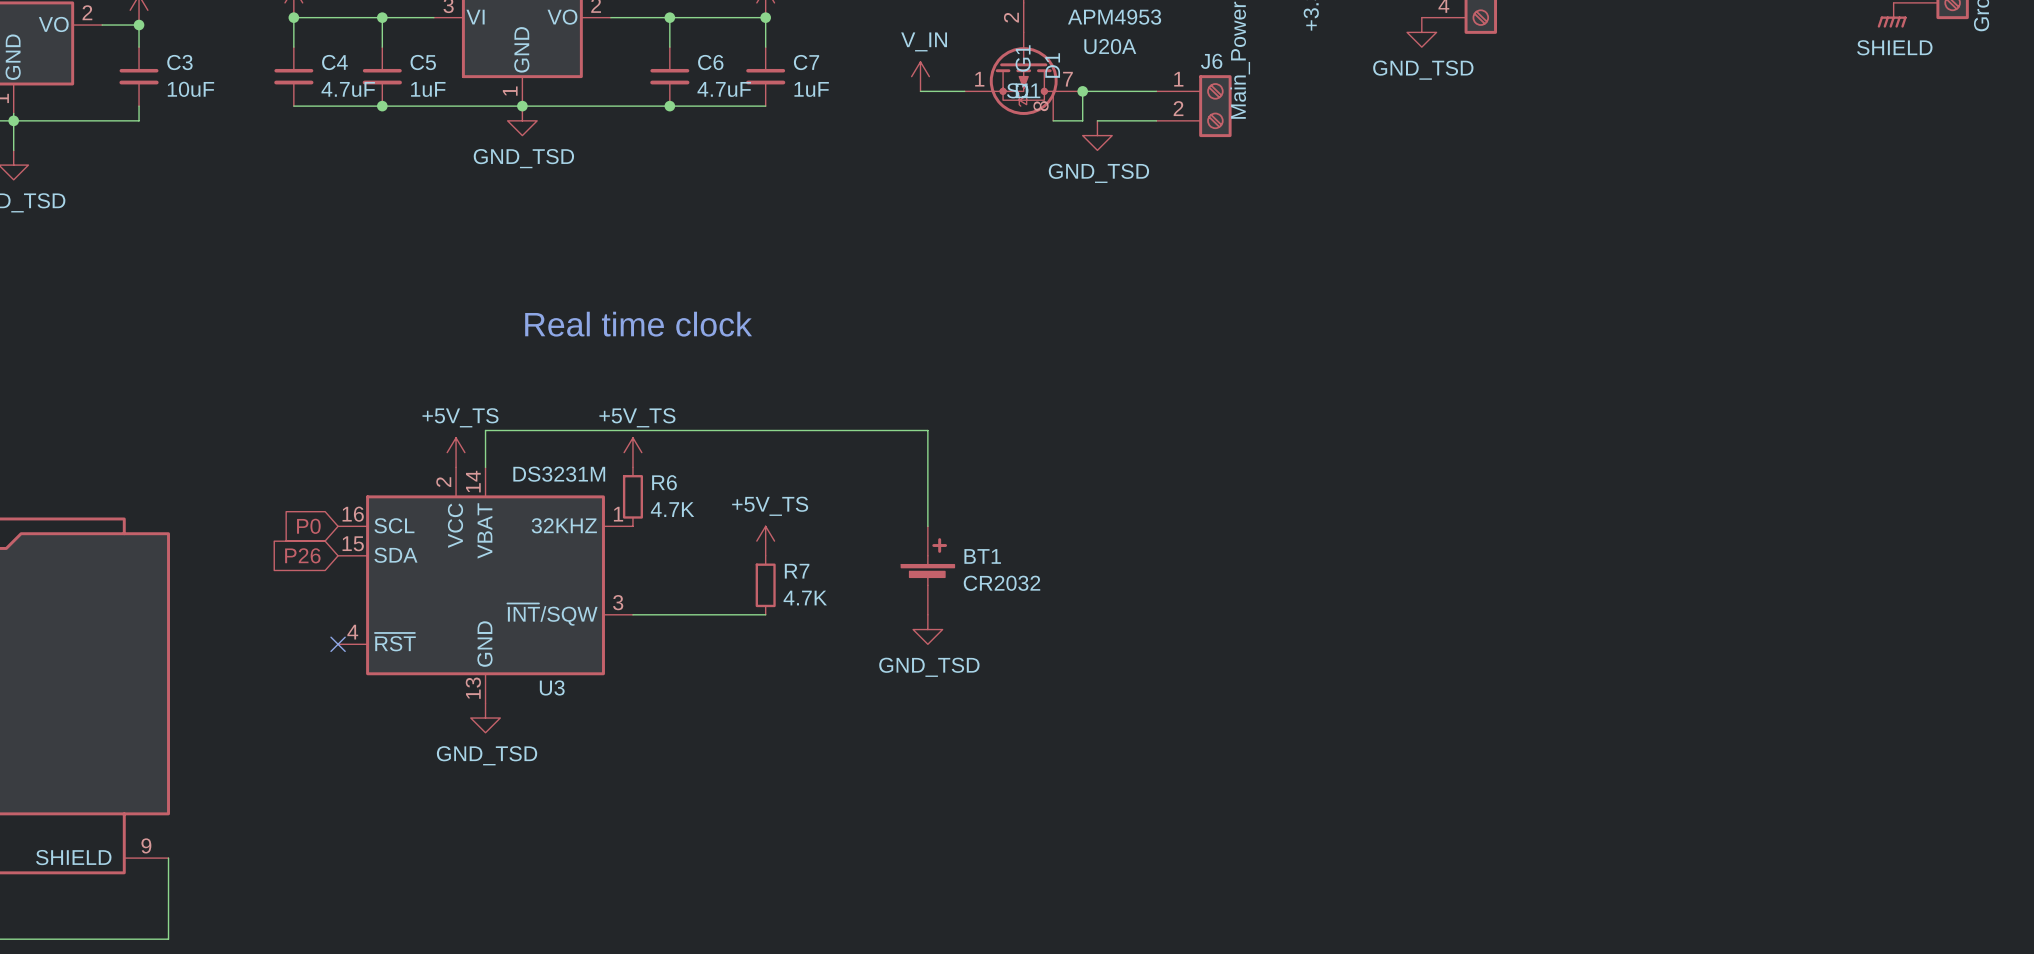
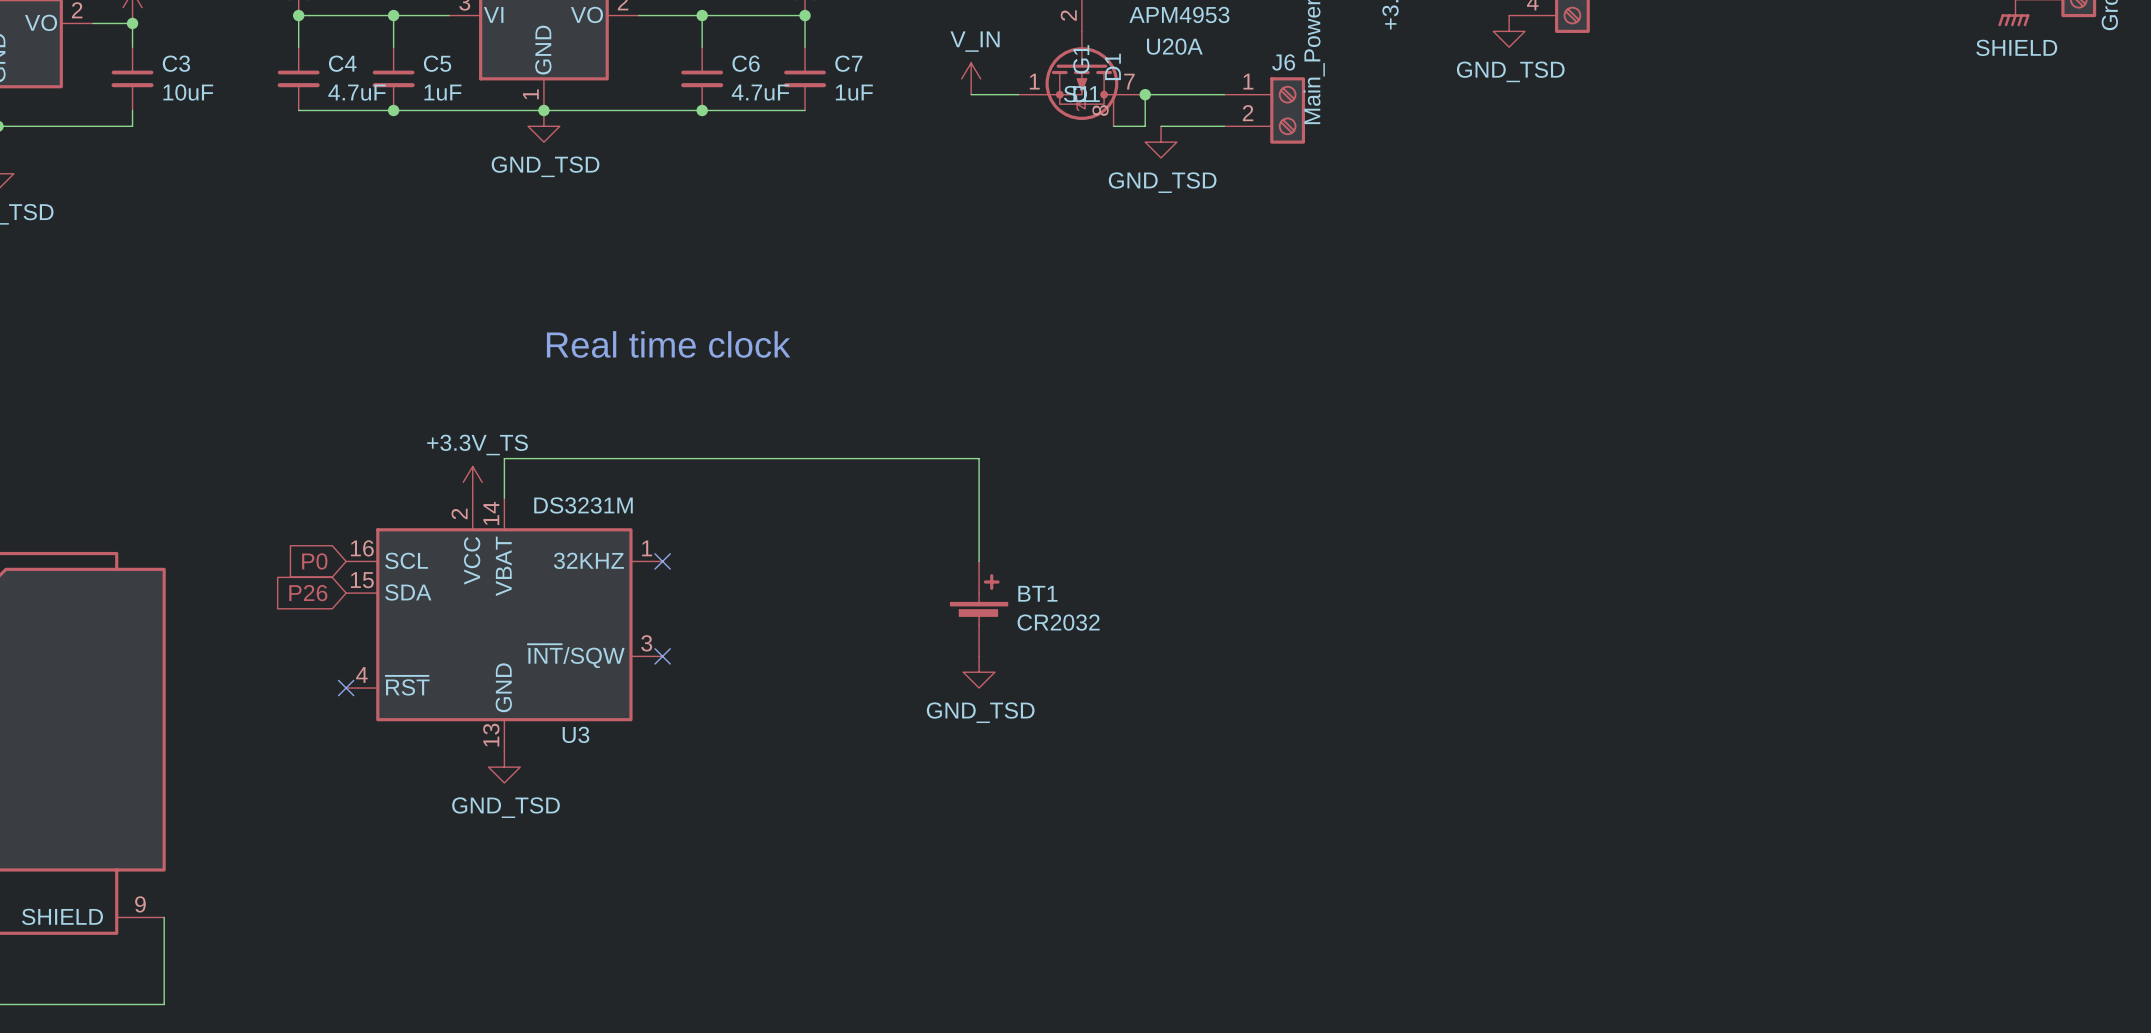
power symbol: +5V_TS (456, 452) -> +3.3V_TS (472, 482)
power symbol: +5V_TS (632, 452) -> none
R6: 4.7K (632, 496) -> none
no-connect mark: none -> (662, 561)
power symbol: +5V_TS (765, 541) -> none
R7: 4.7K (765, 585) -> none
wire: (632, 614) (765, 614) -> none
no-connect mark: none -> (662, 656)

